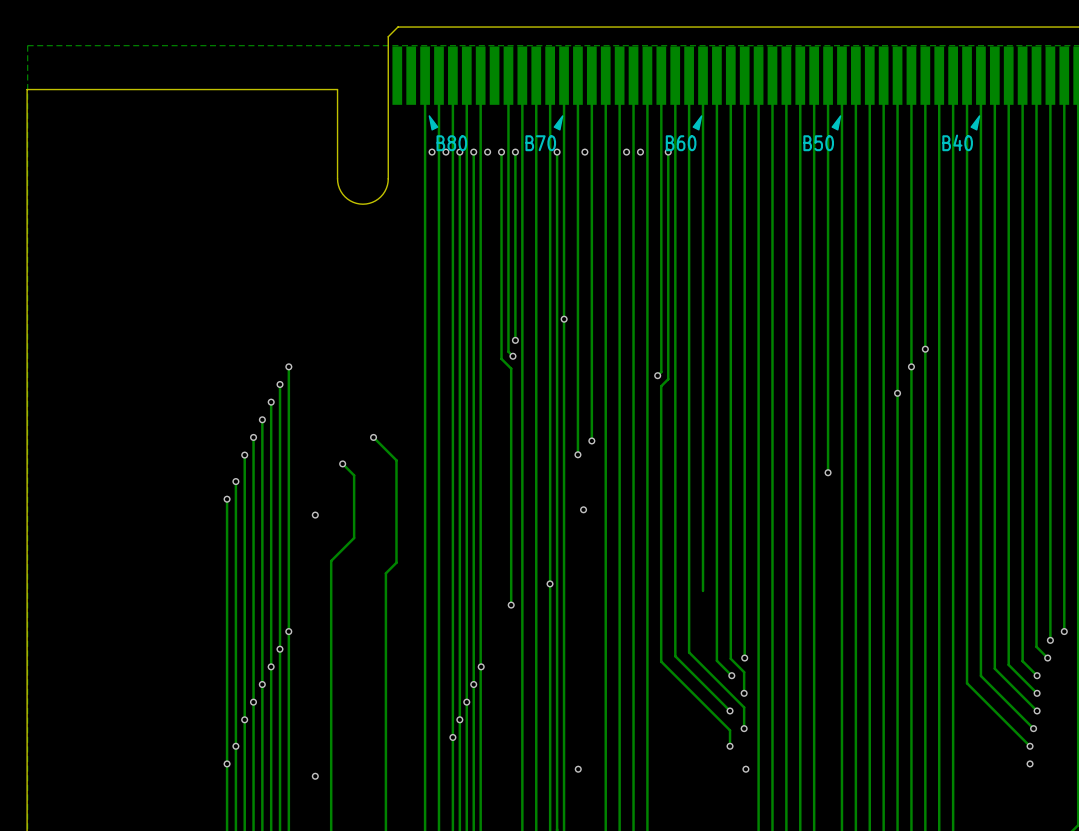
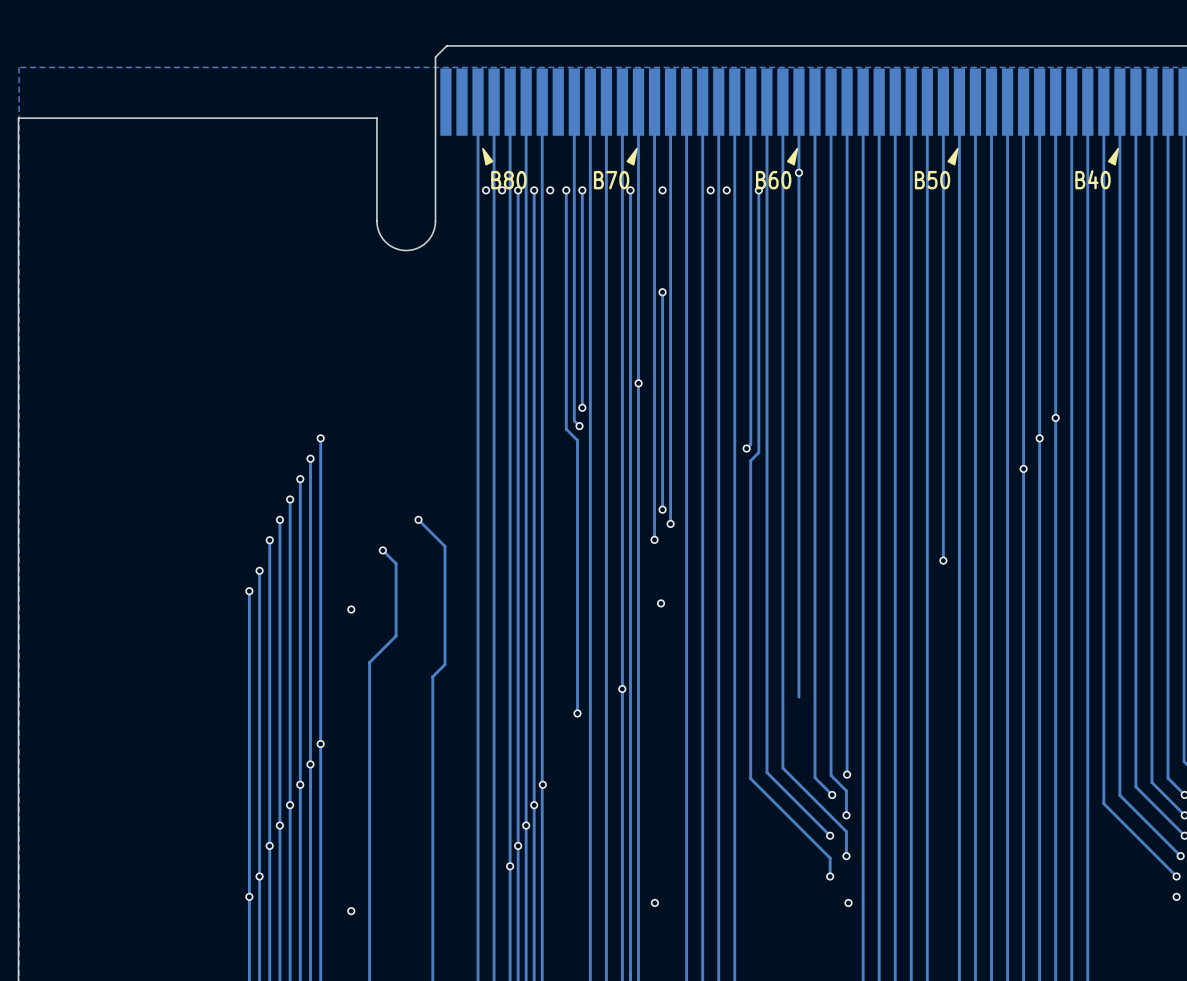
via: none -> (798, 172)
track: none -> (662, 292) (662, 509)
via: none -> (662, 292)
via: none -> (662, 509)

